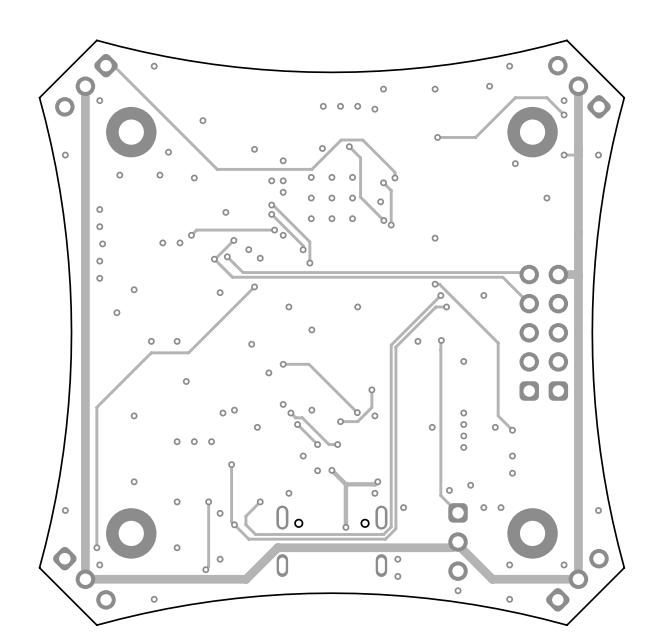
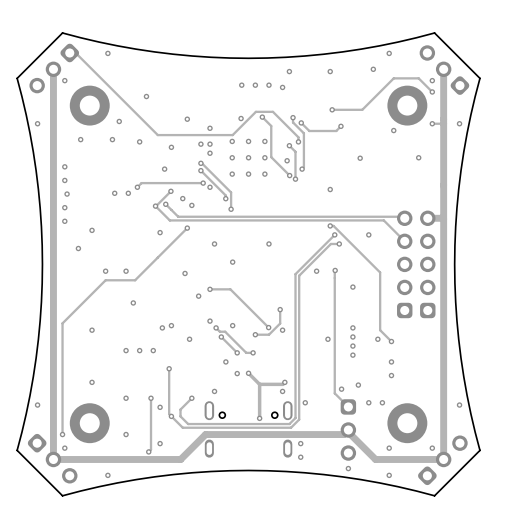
track: none -> (293, 117) (293, 122) (303, 133) (303, 167) (302, 169)
via: none -> (293, 117)
track: none -> (301, 122) (309, 131) (336, 131) (340, 126)
via: none -> (301, 122)
via: none -> (340, 126)
via: none -> (171, 147)
via: none -> (360, 158)
via: none -> (302, 169)

